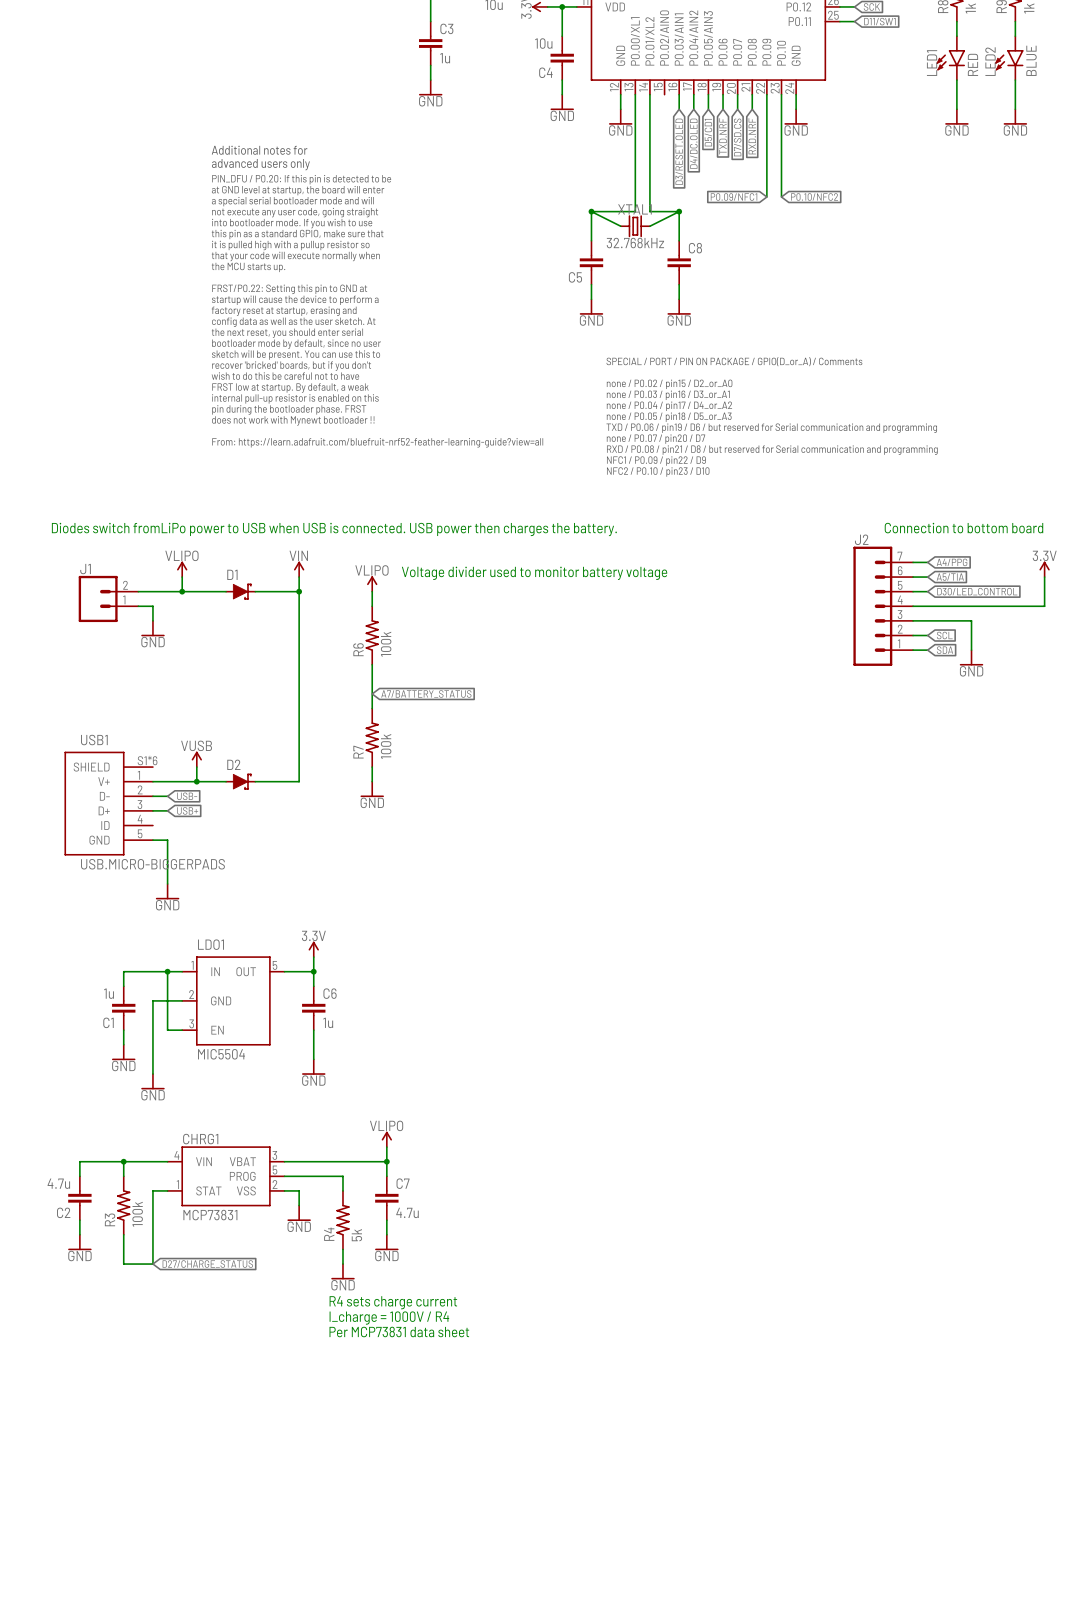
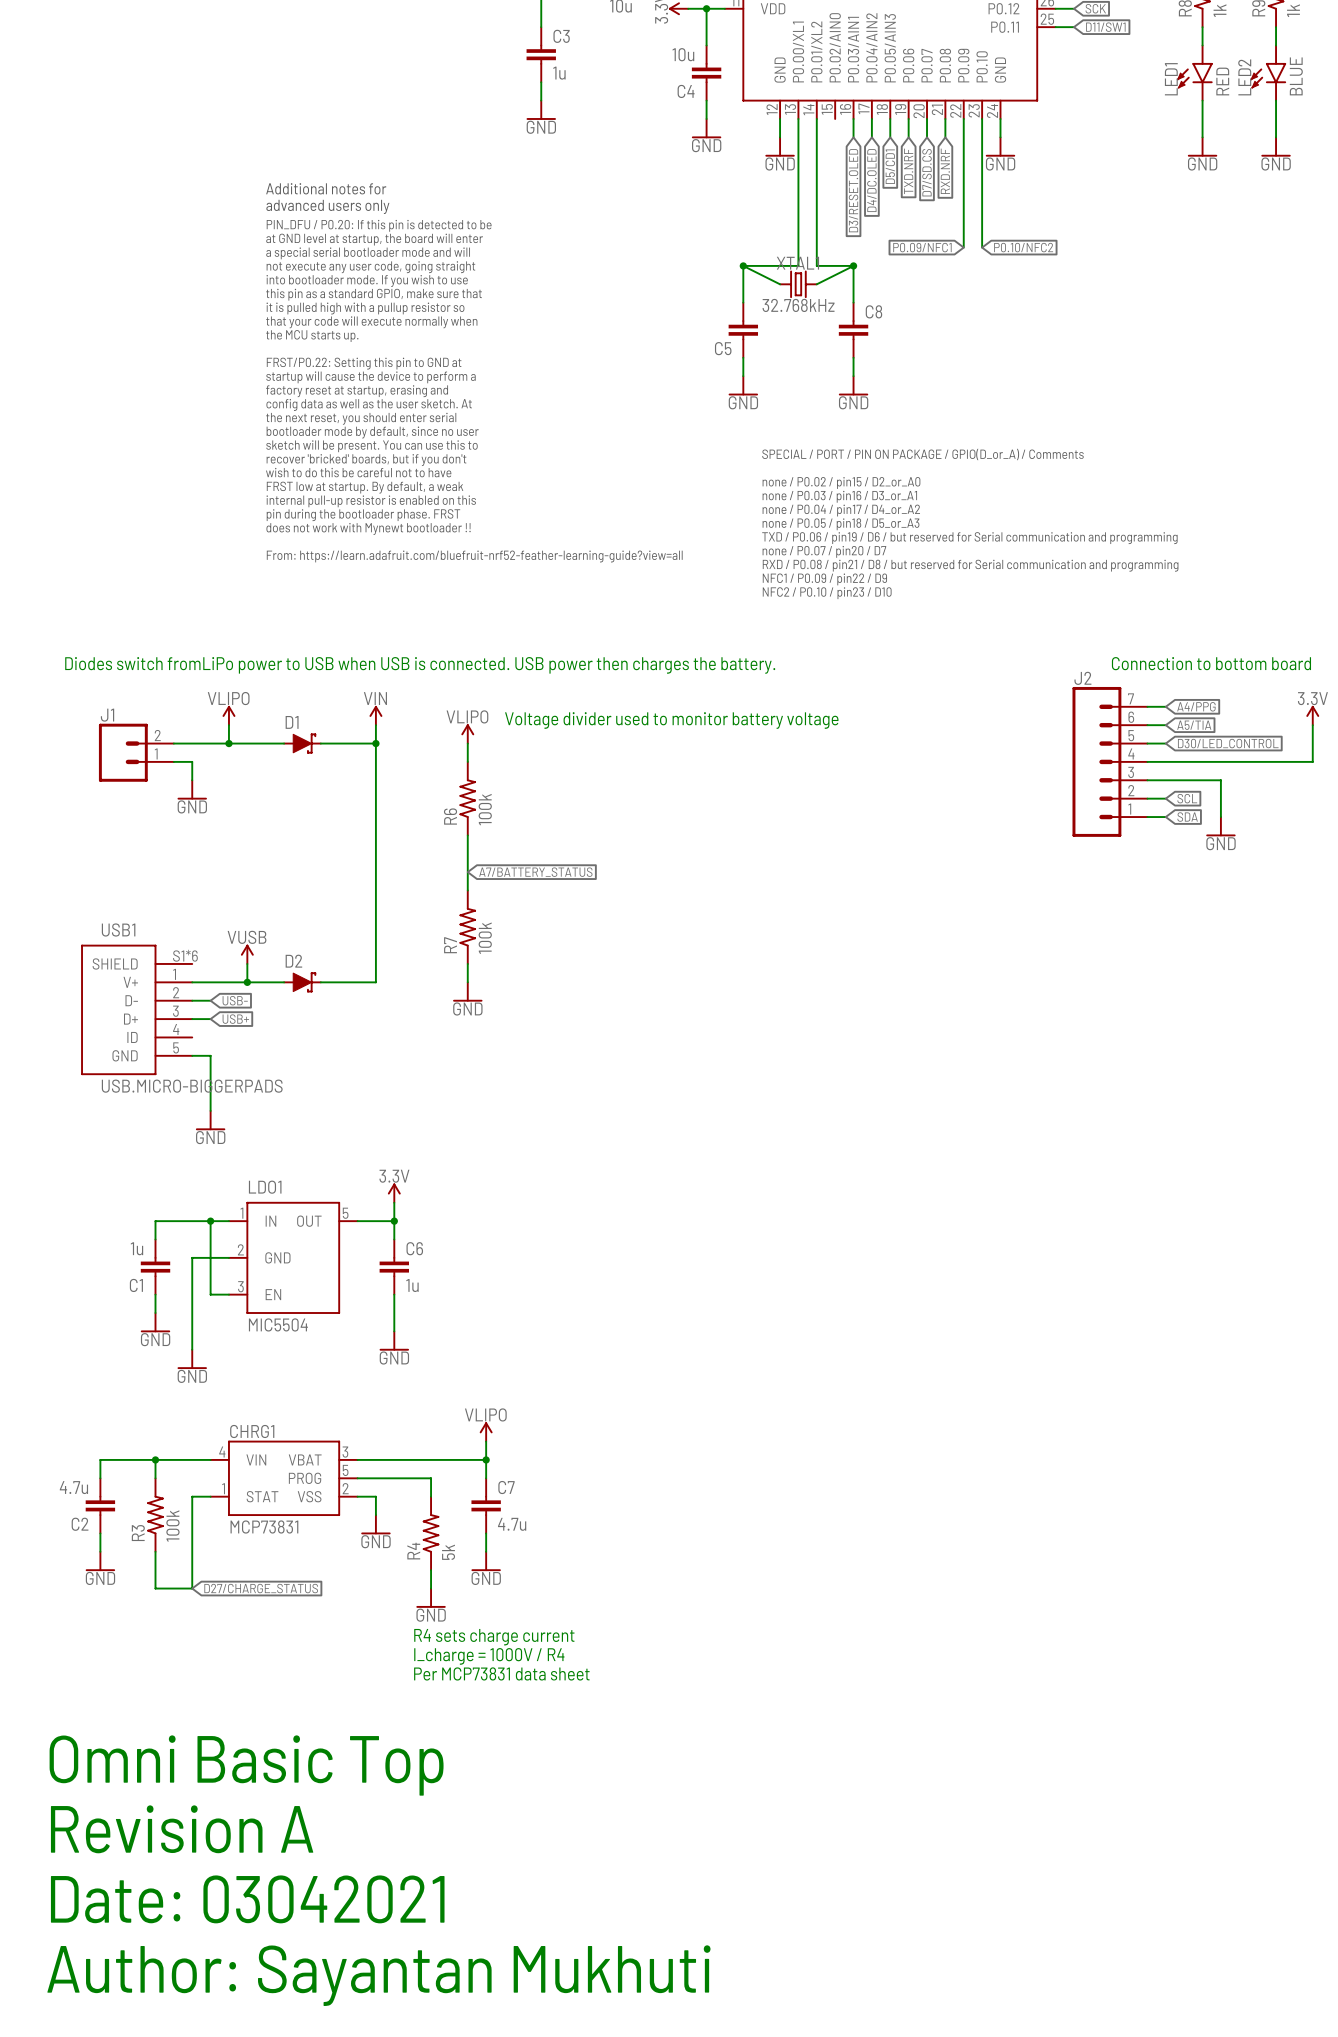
text: none -> Omni Basic Top (246, 1765)
text: none -> Revision A (182, 1829)
text: none -> Date: 03042021 (247, 1899)
text: none -> Author: Sayantan Mukhuti (378, 1975)

